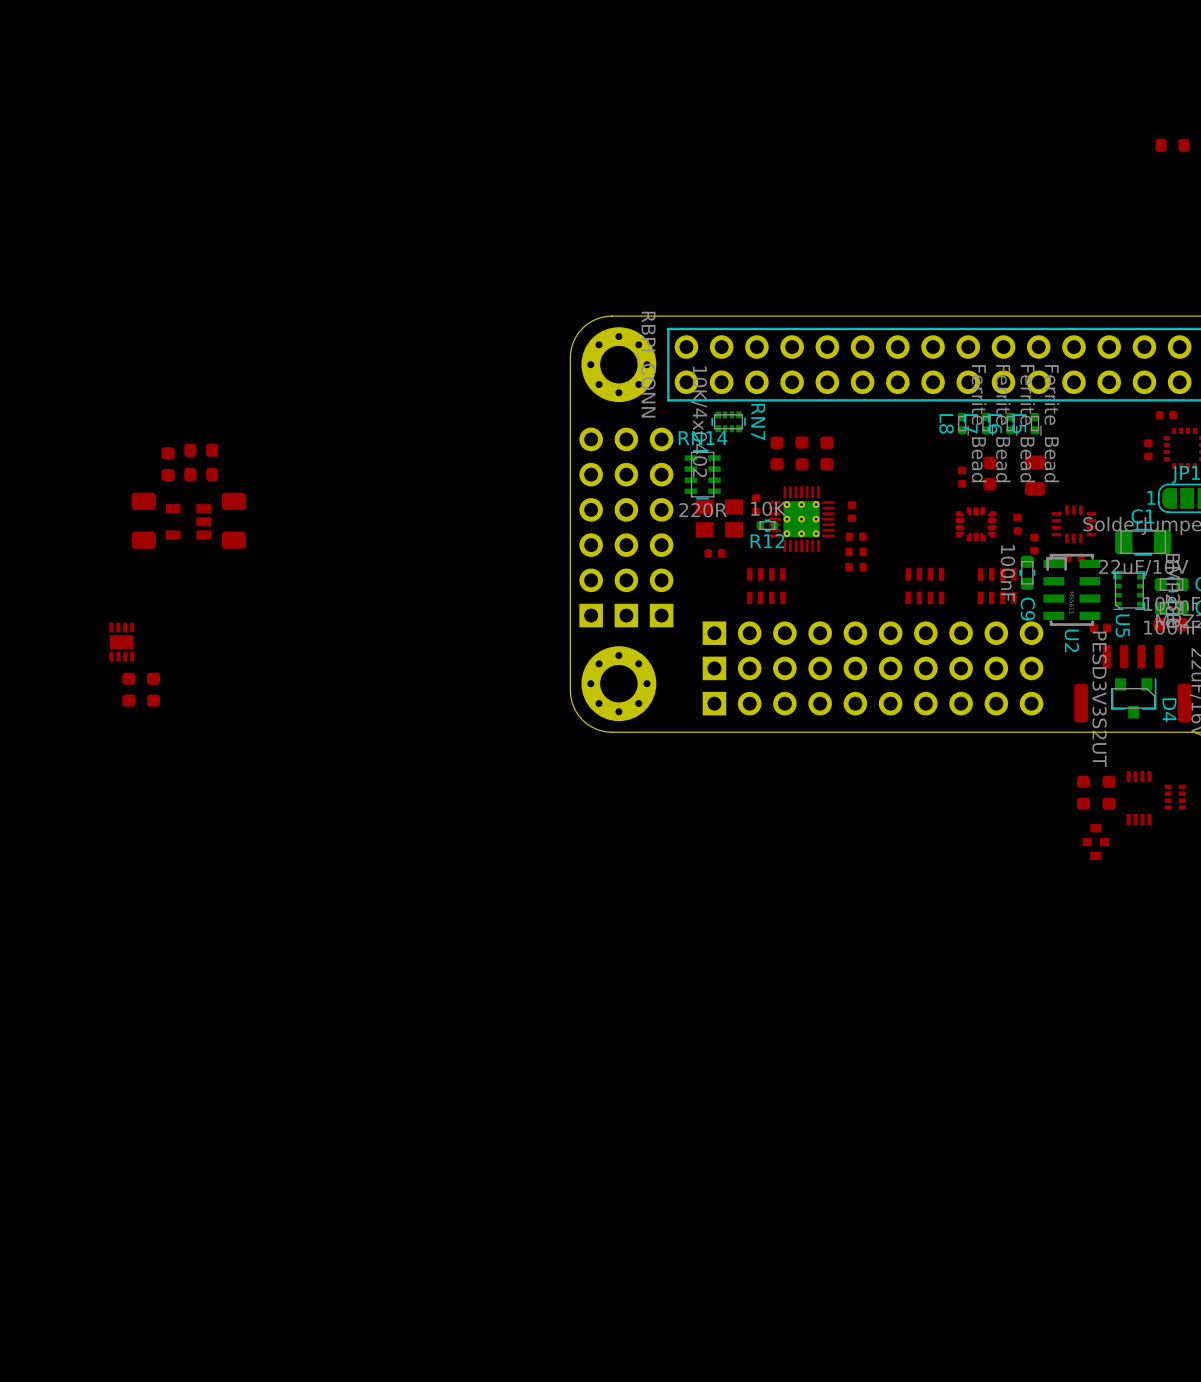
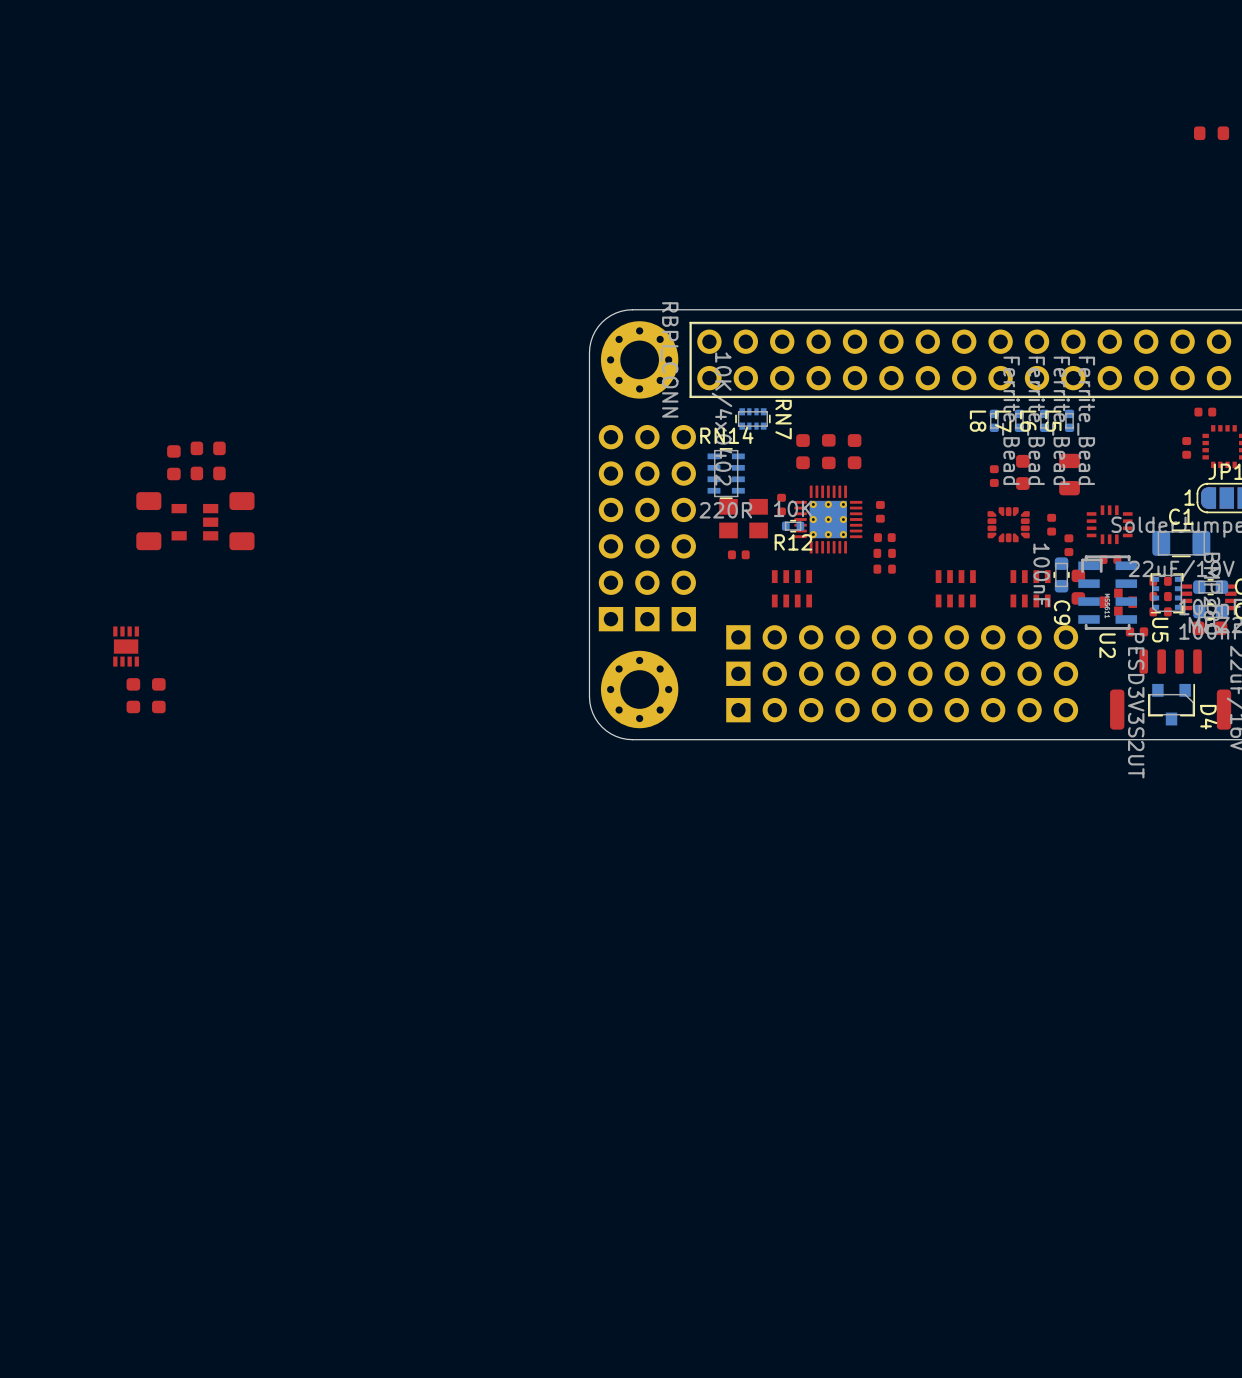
part: none -> (1160, 581)
part: none -> (1078, 587)
part: none -> (1160, 596)
part: none -> (1160, 611)
part: (1083, 792) -> none
part: (1109, 792) -> none
part: (1175, 797) -> none
part rotation: 0° (1138, 798) -> 90° clockwise (1208, 597)
part position: (1138, 798) -> (1208, 597)
part rotation: 0° (1095, 842) -> 90° clockwise (1118, 602)
part position: (1095, 842) -> (1118, 602)

